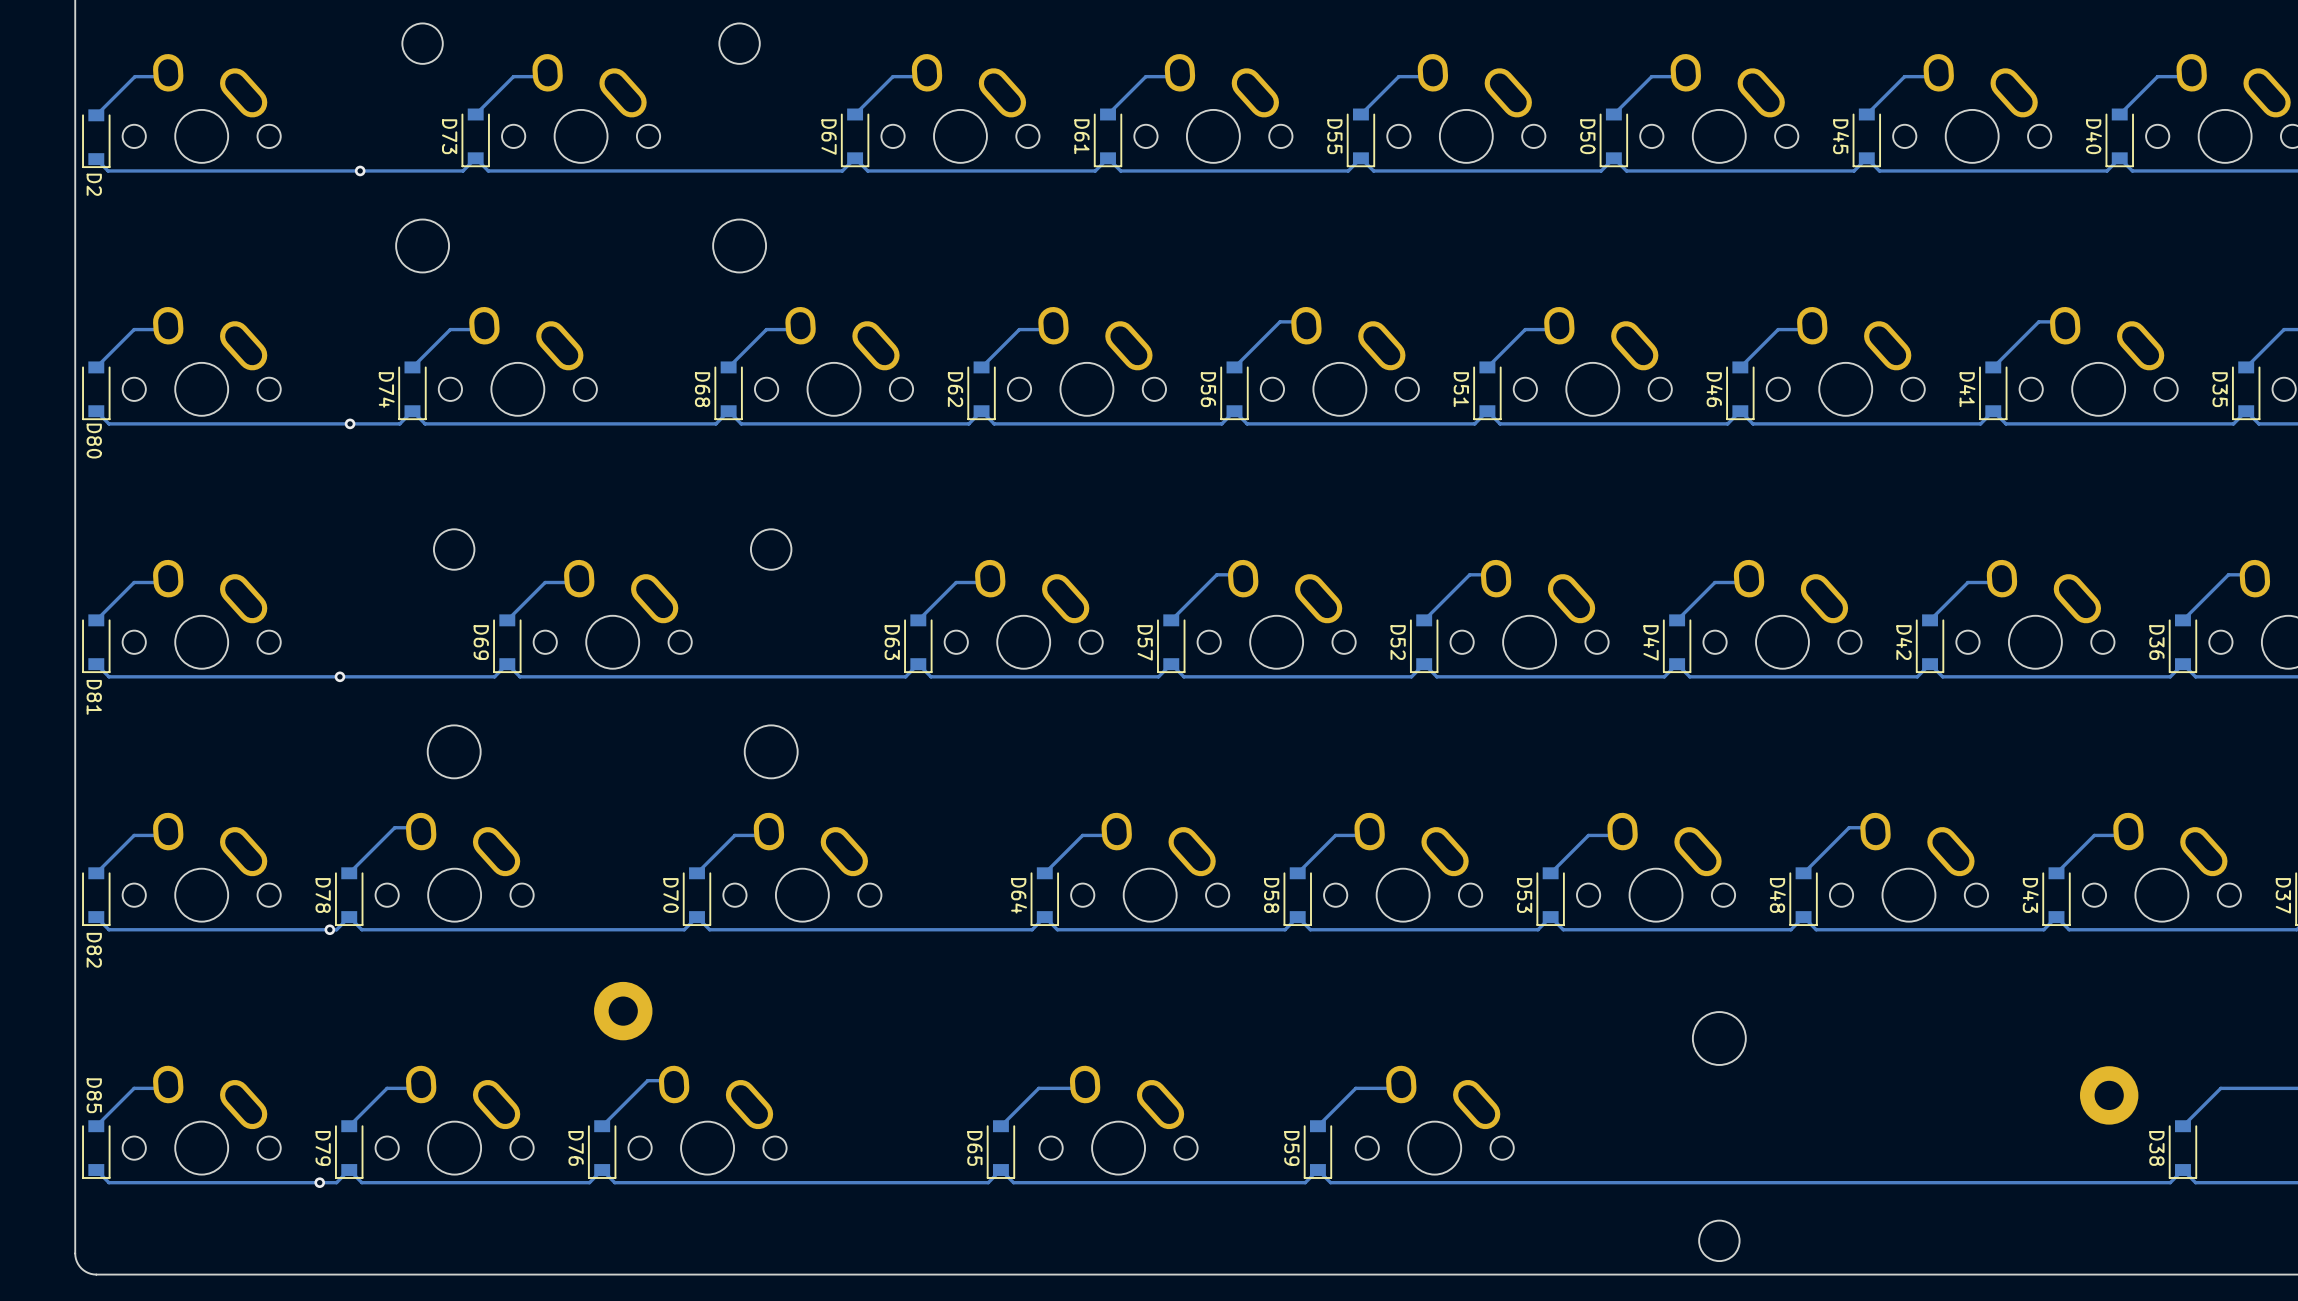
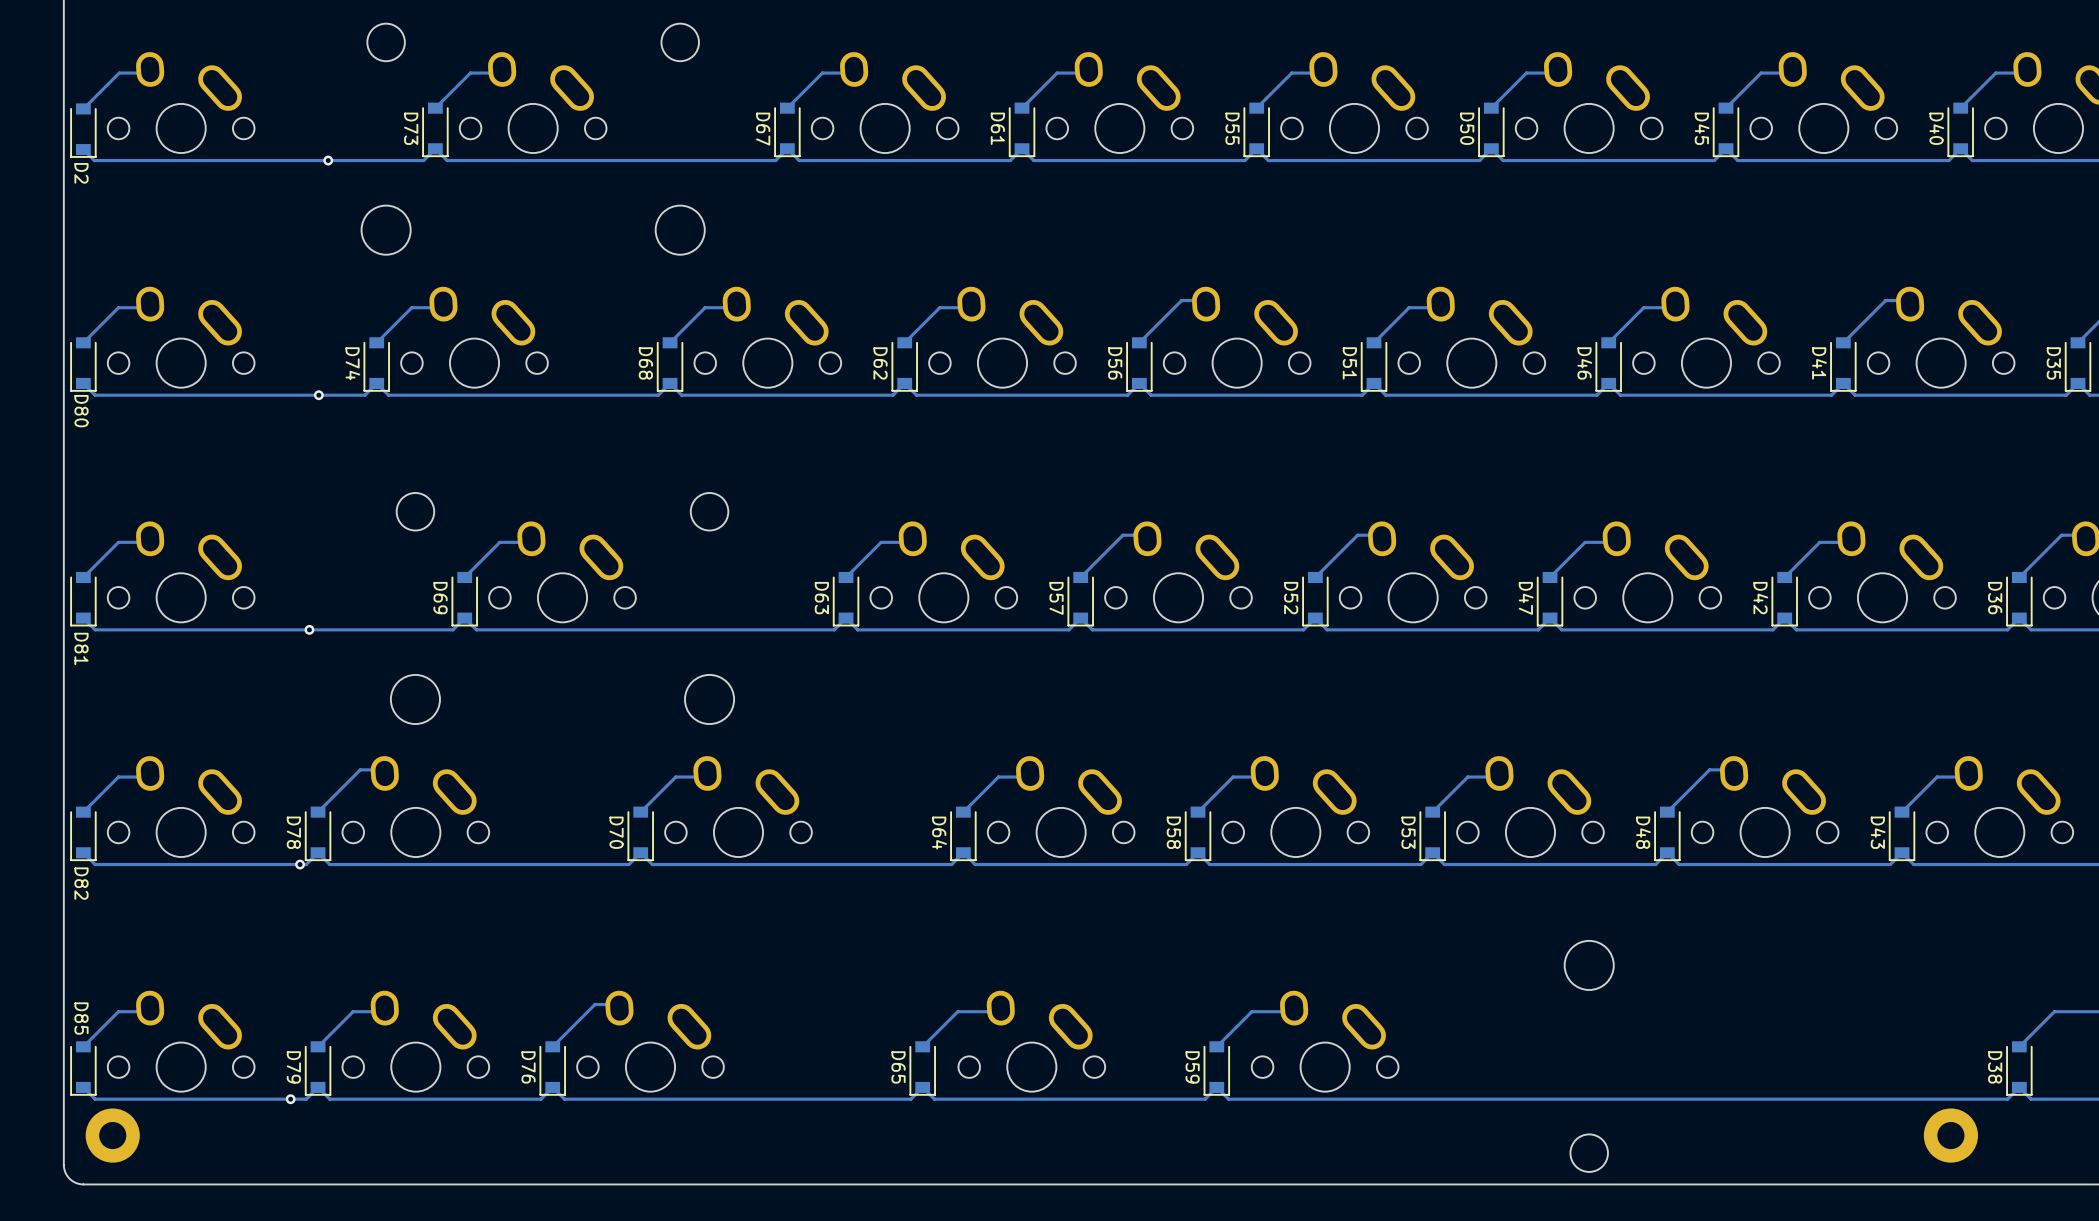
part: (623, 1011) -> none
part position: (2109, 1095) -> (1950, 1135)
part: none -> (112, 1135)

